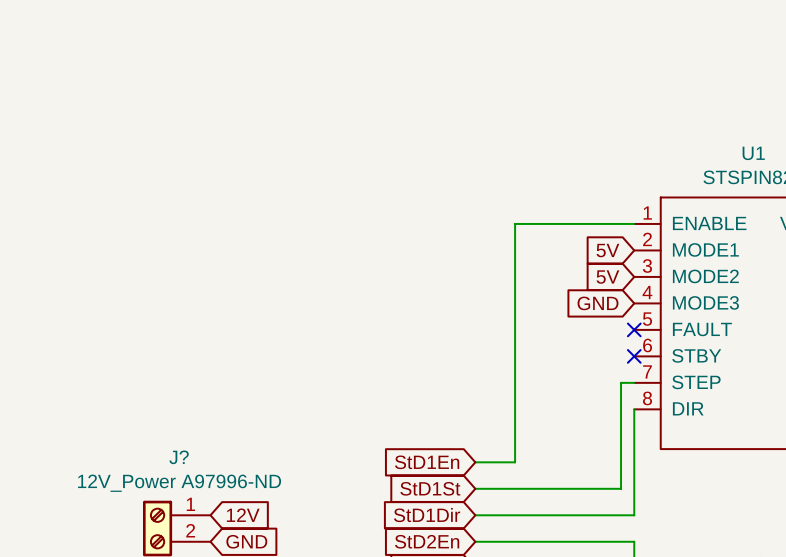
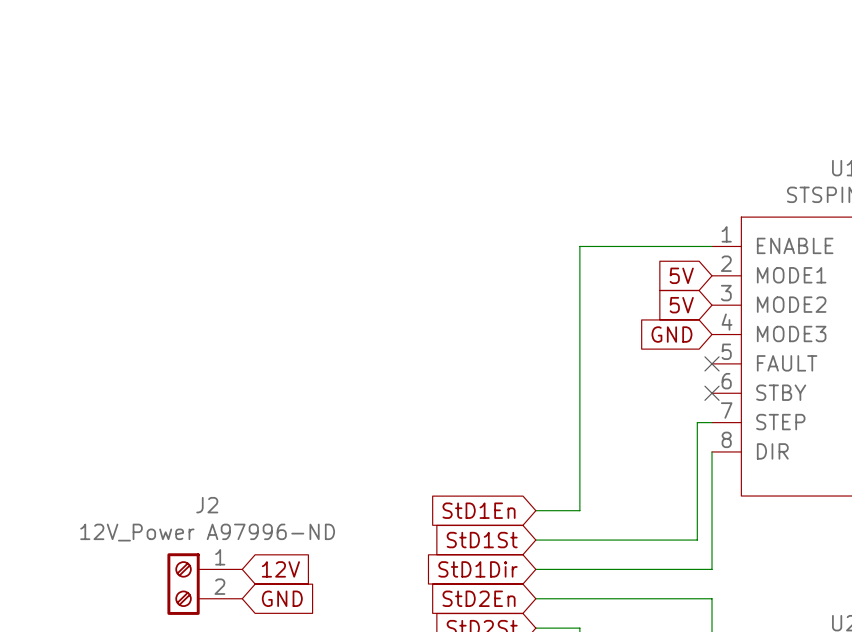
J? name: J? (179, 457) -> J2 (207, 505)

